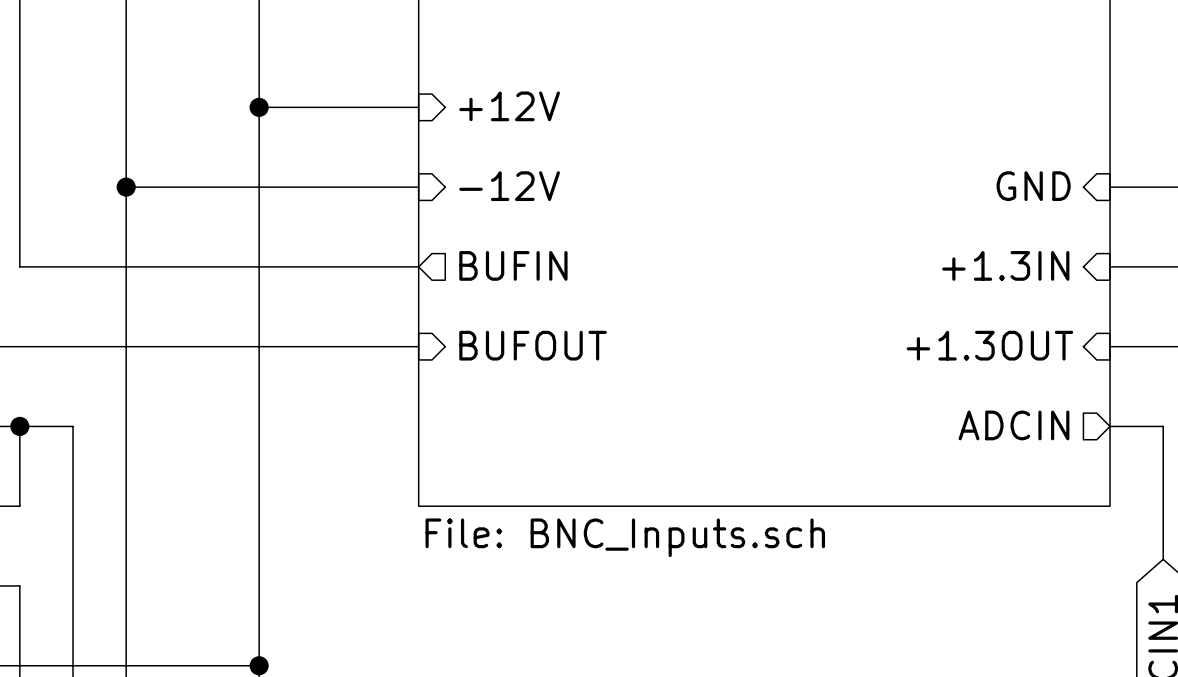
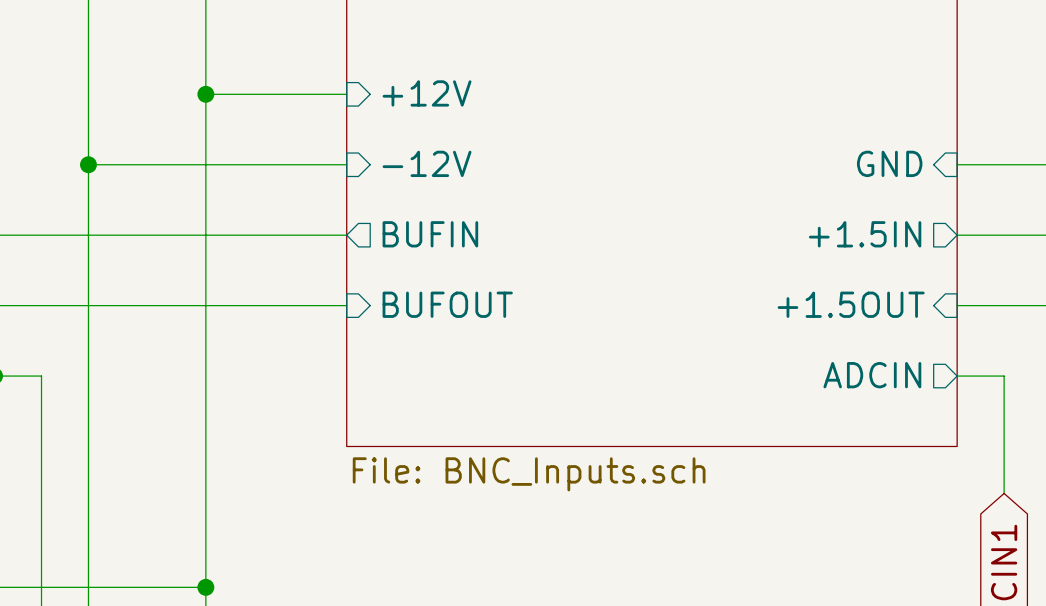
sheet pin shape: input (1005, 265) -> output (865, 234)
sheet pin: +1.3IN (1005, 265) -> +1.5IN (865, 234)
sheet pin: +1.3OUT (989, 345) -> +1.5OUT (851, 304)

